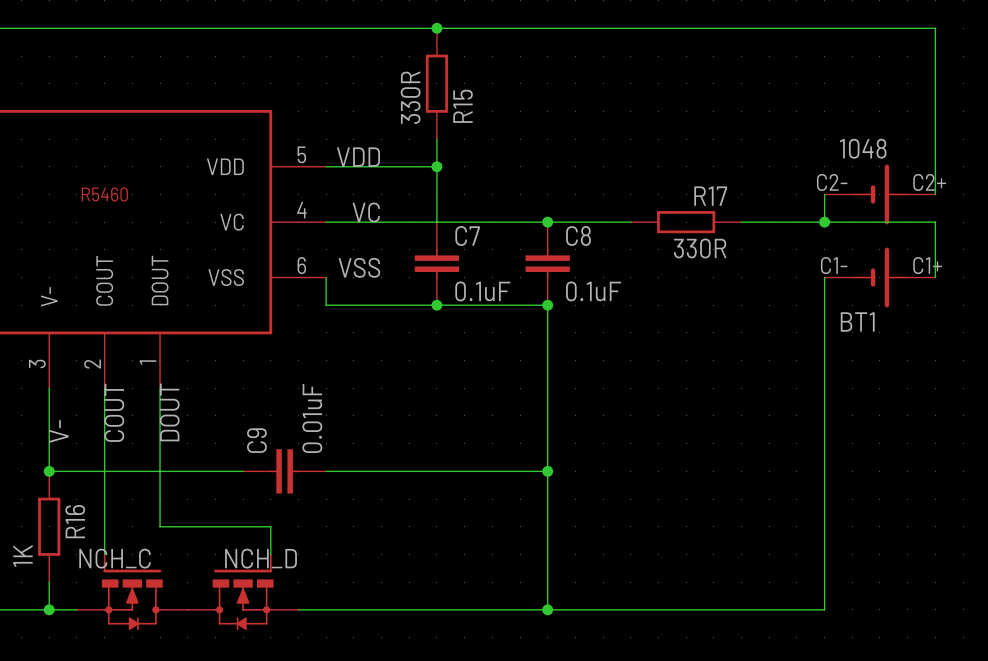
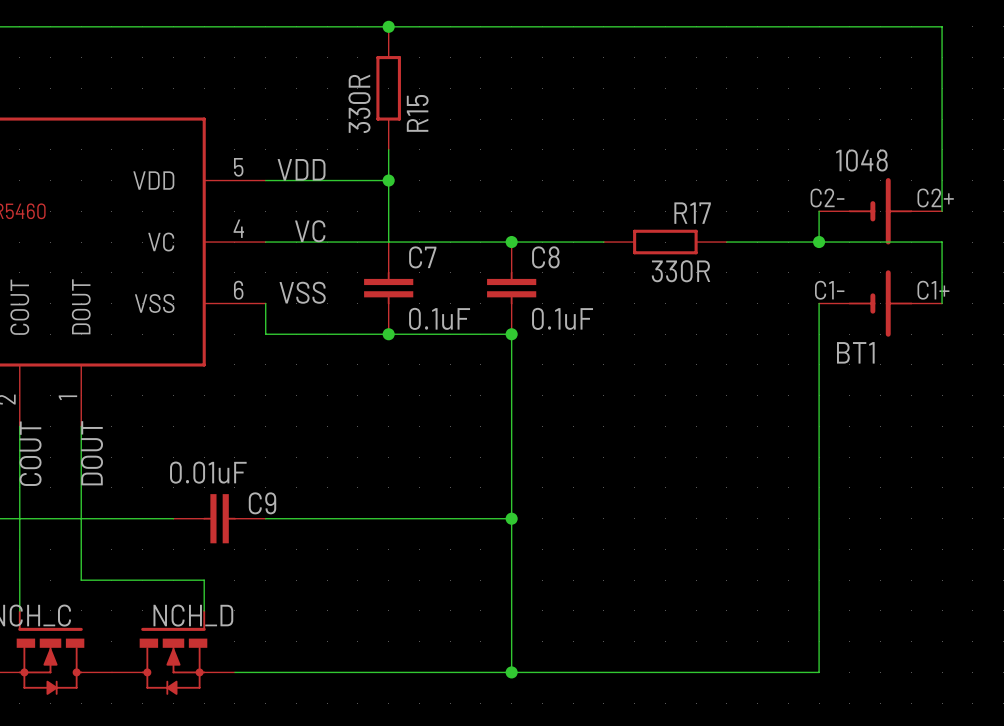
C9 value rotation: 0° (312, 418) -> 90° clockwise (208, 472)
C9 name rotation: 0° (256, 440) -> 90° clockwise (262, 503)
C9 name position: C9 (256, 440) -> C9 (262, 503)

